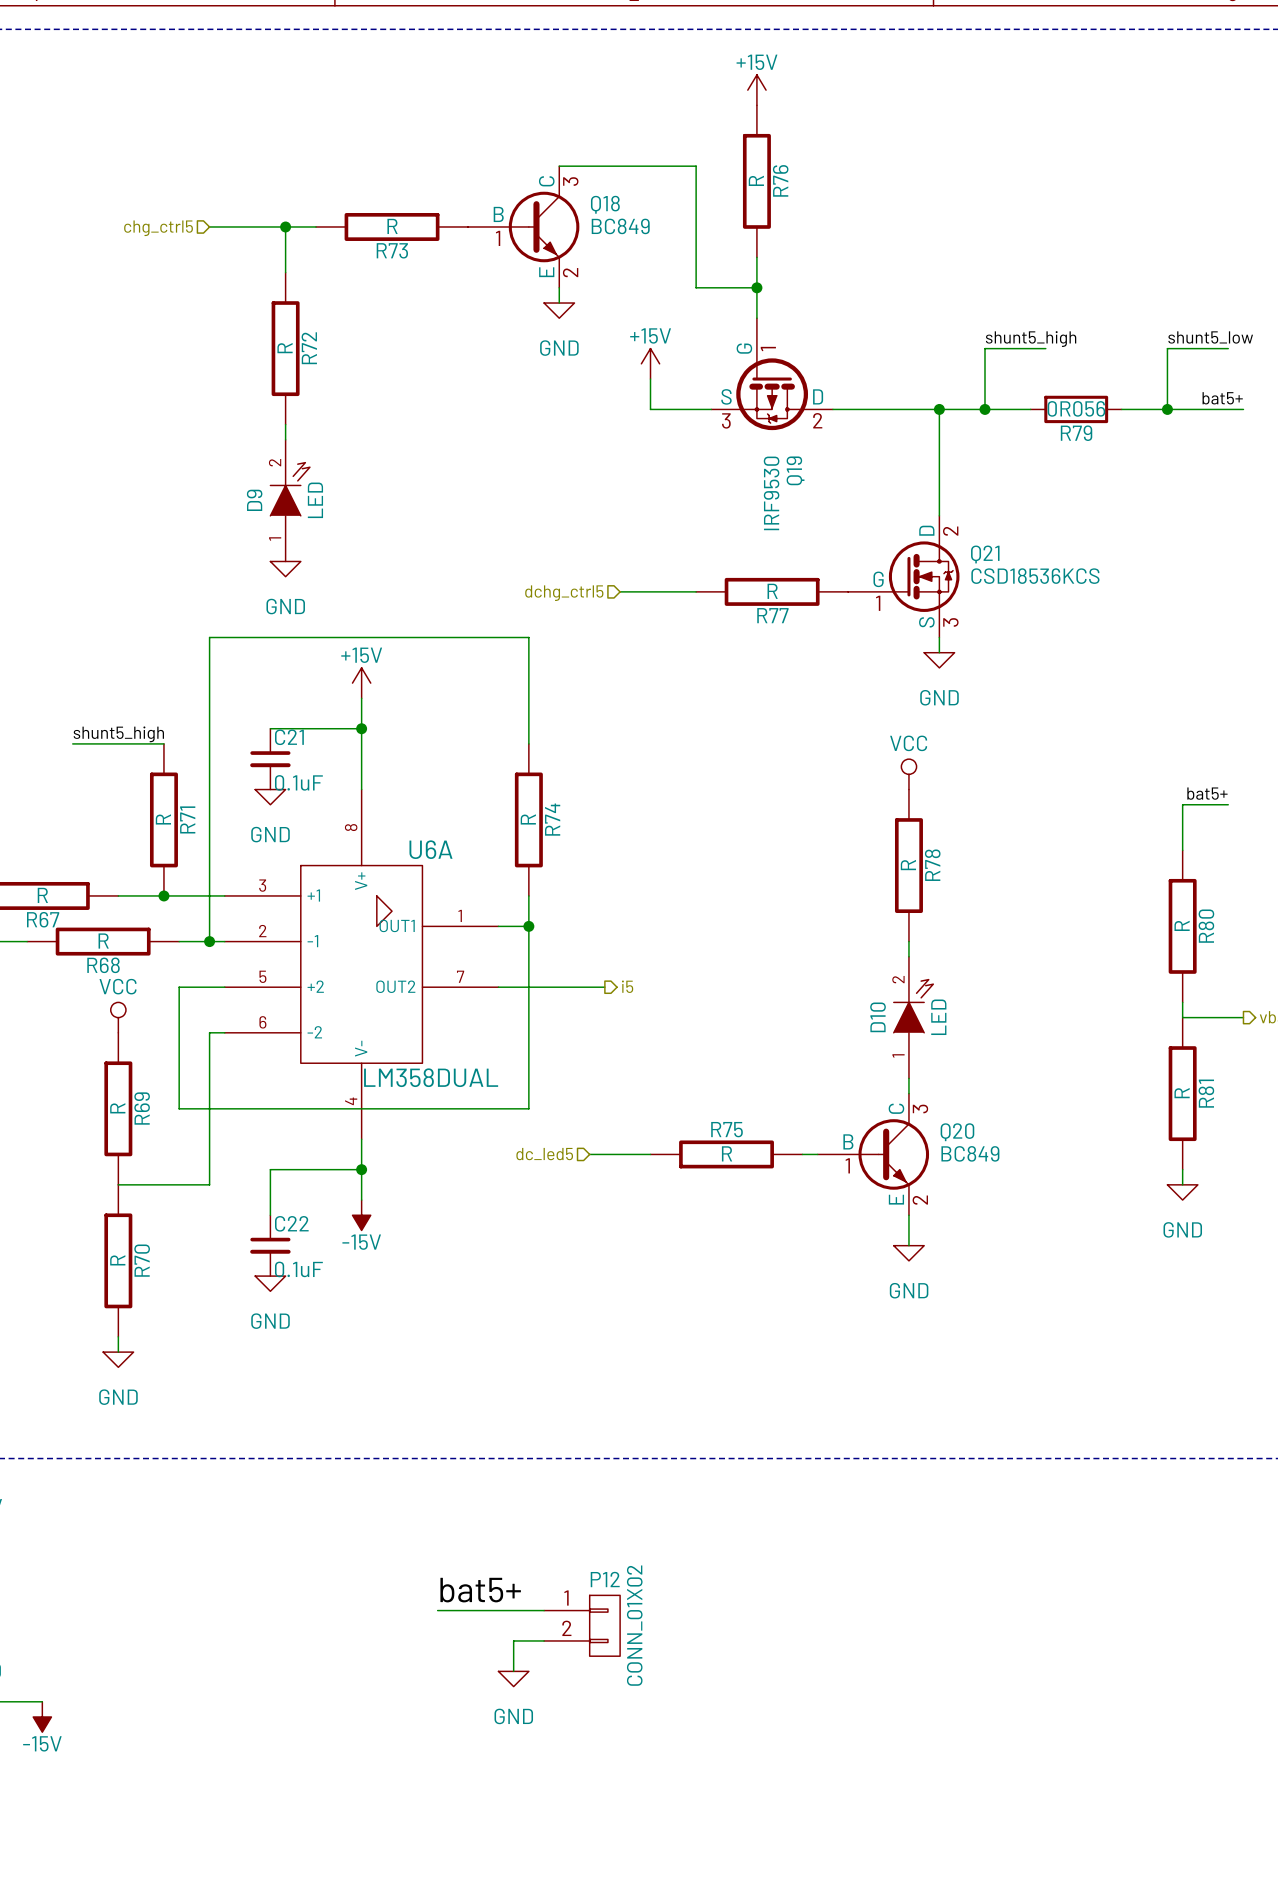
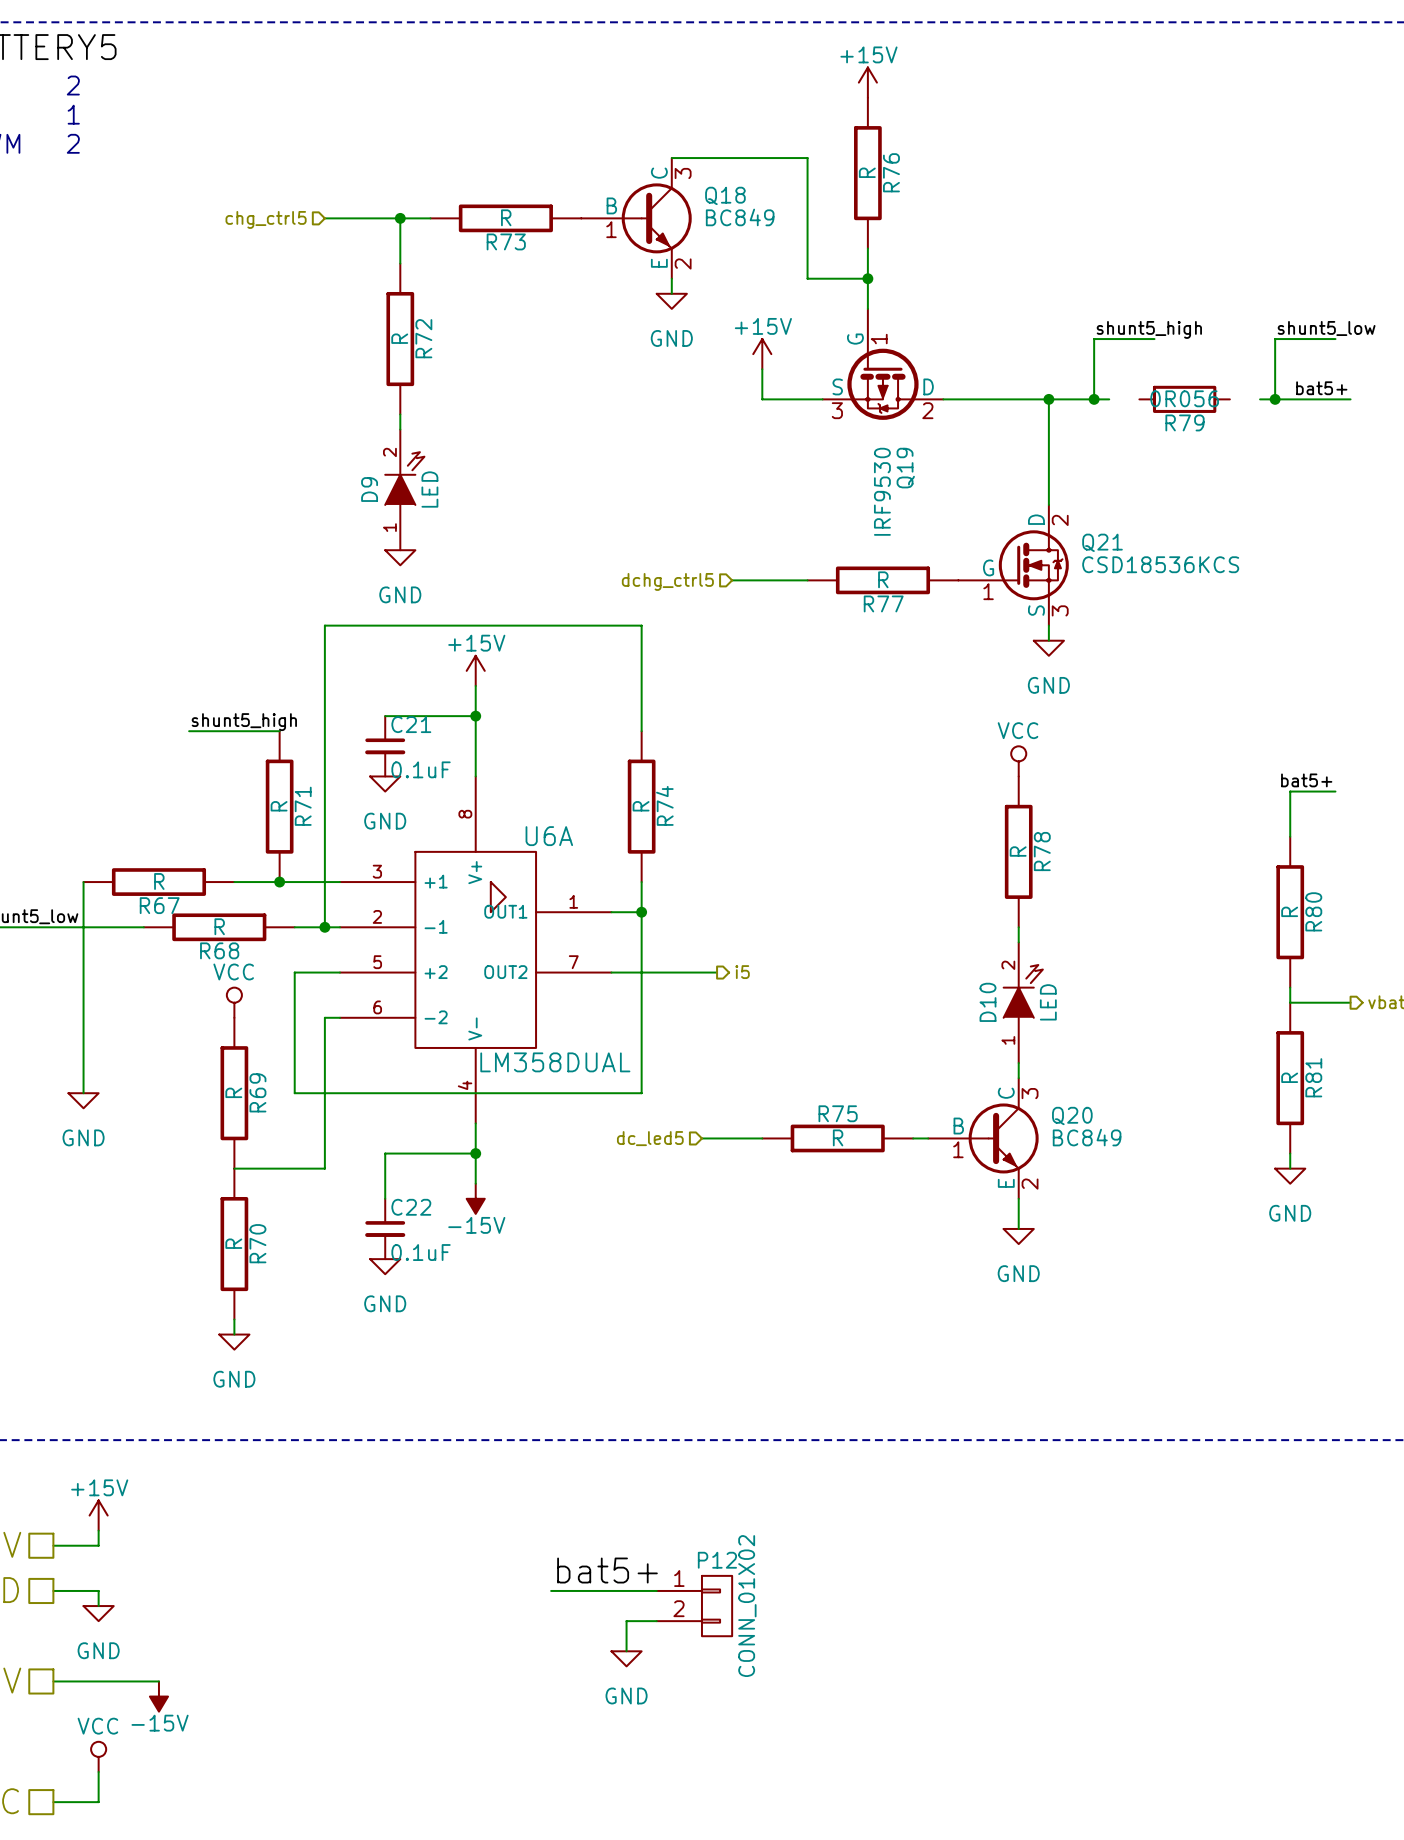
wire: (1000, 409) (1030, 409) -> none
wire: (1121, 409) (1152, 409) -> none

